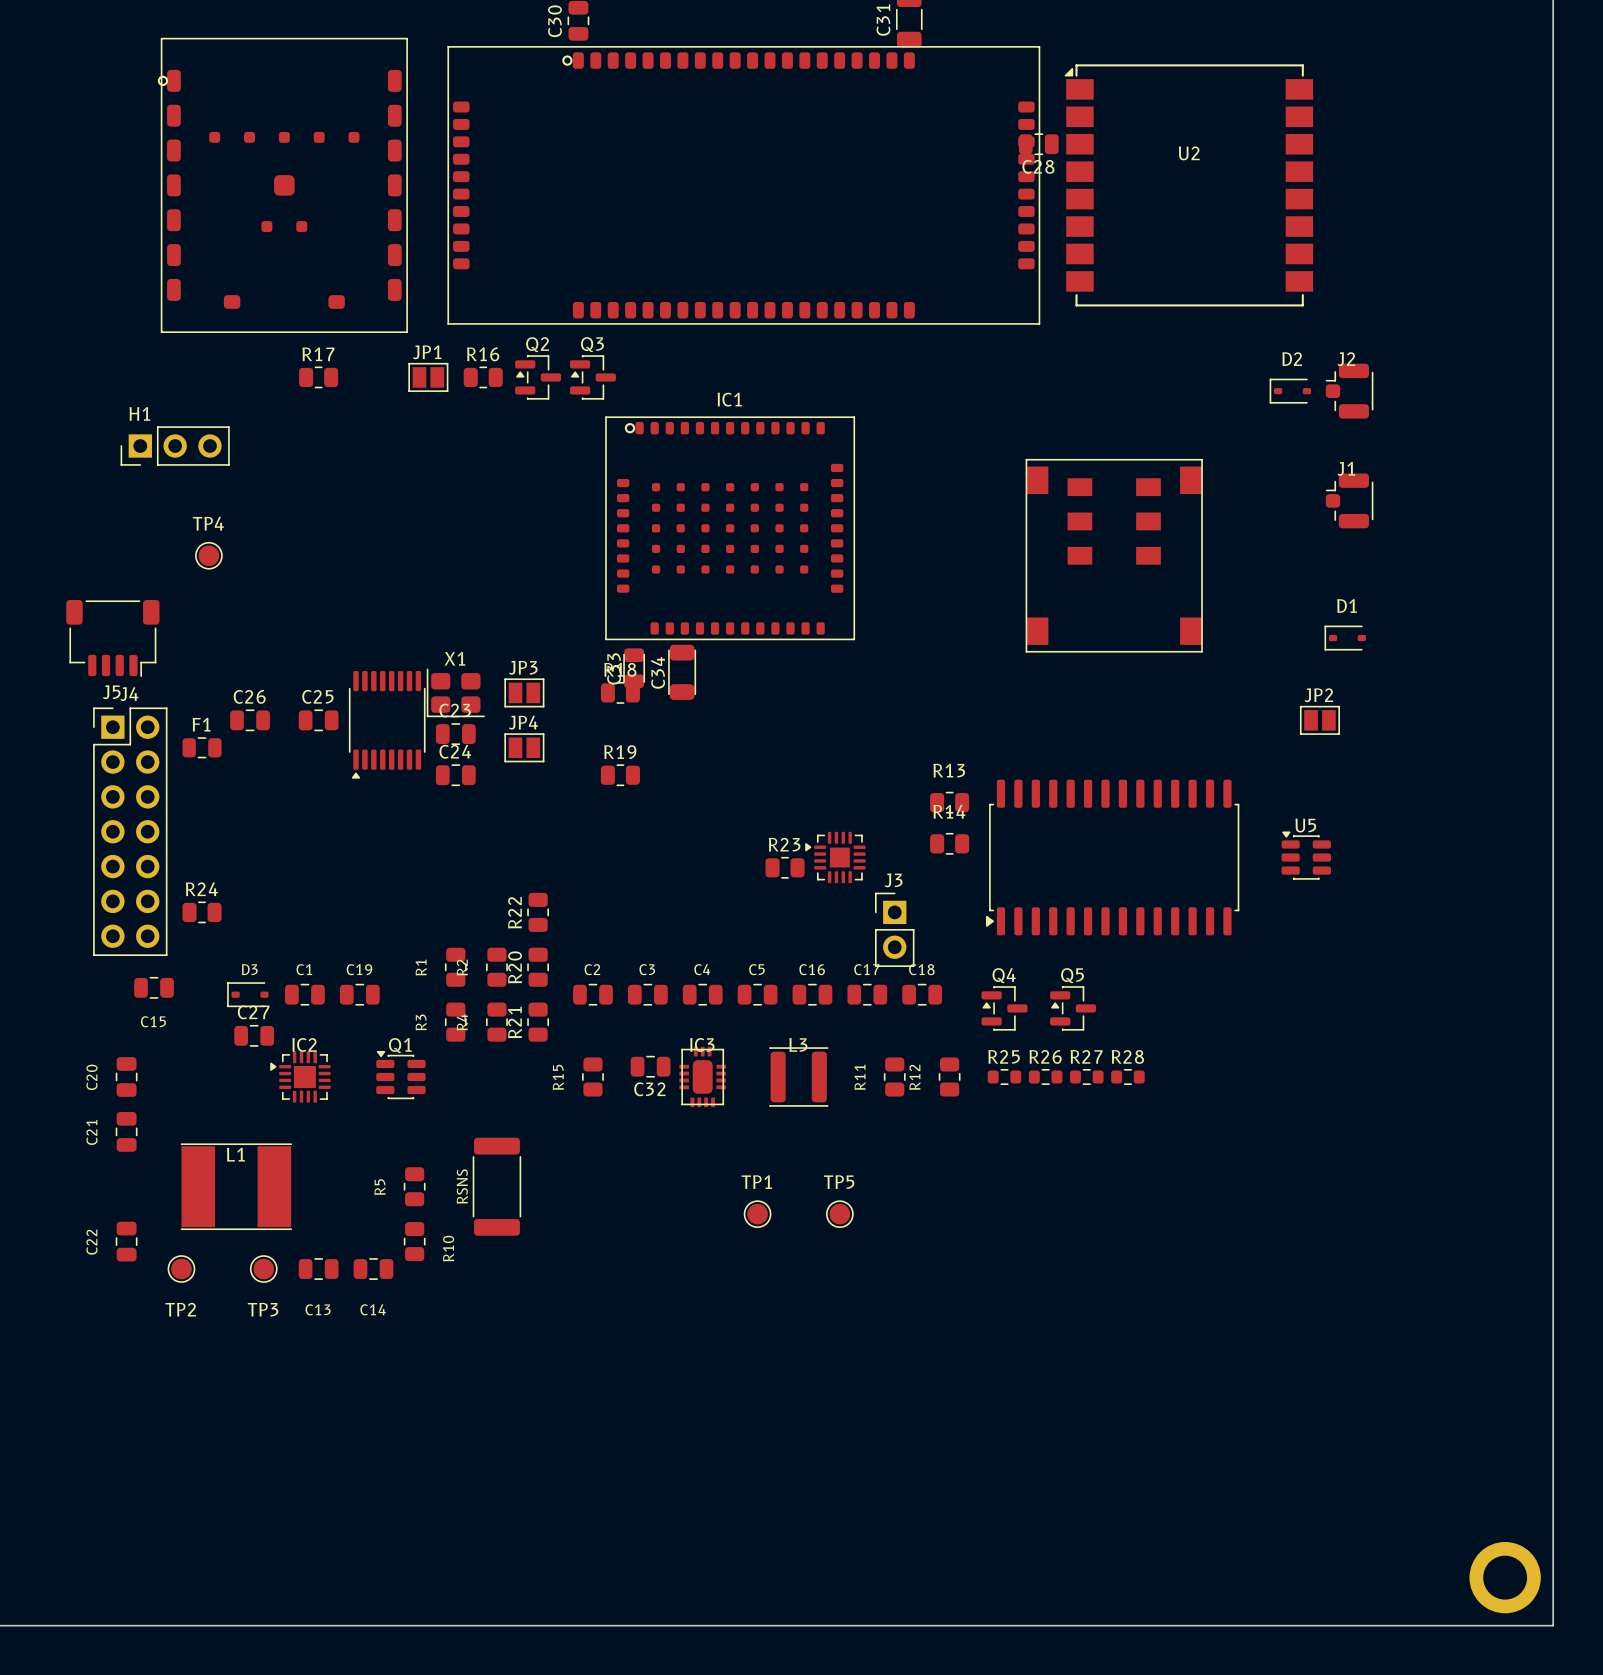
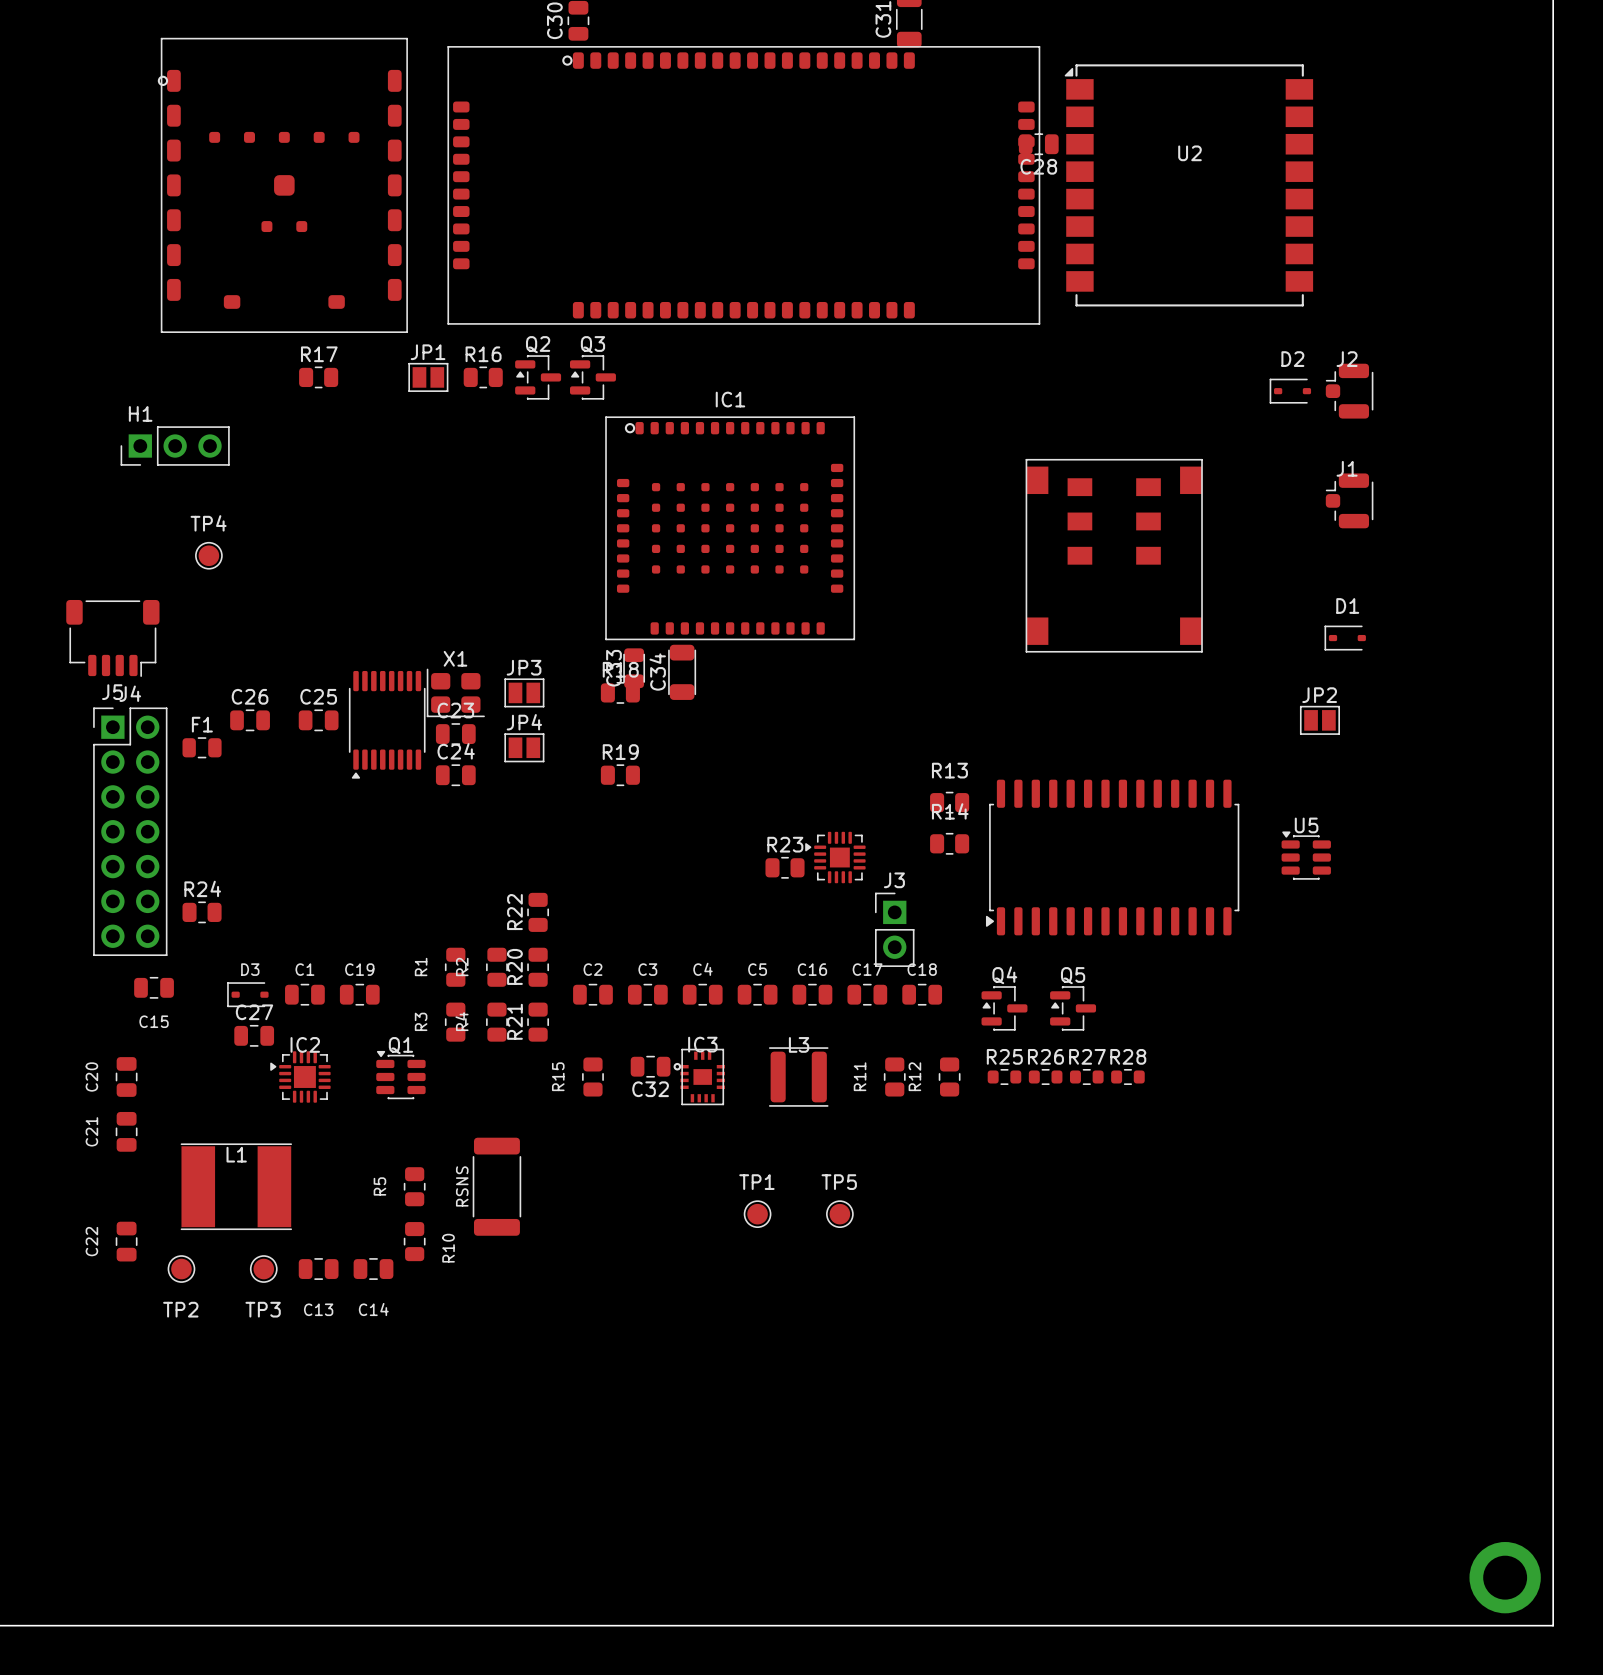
IC3 footprint: [679, 1046, 727, 1108] -> [673, 1048, 726, 1106]

